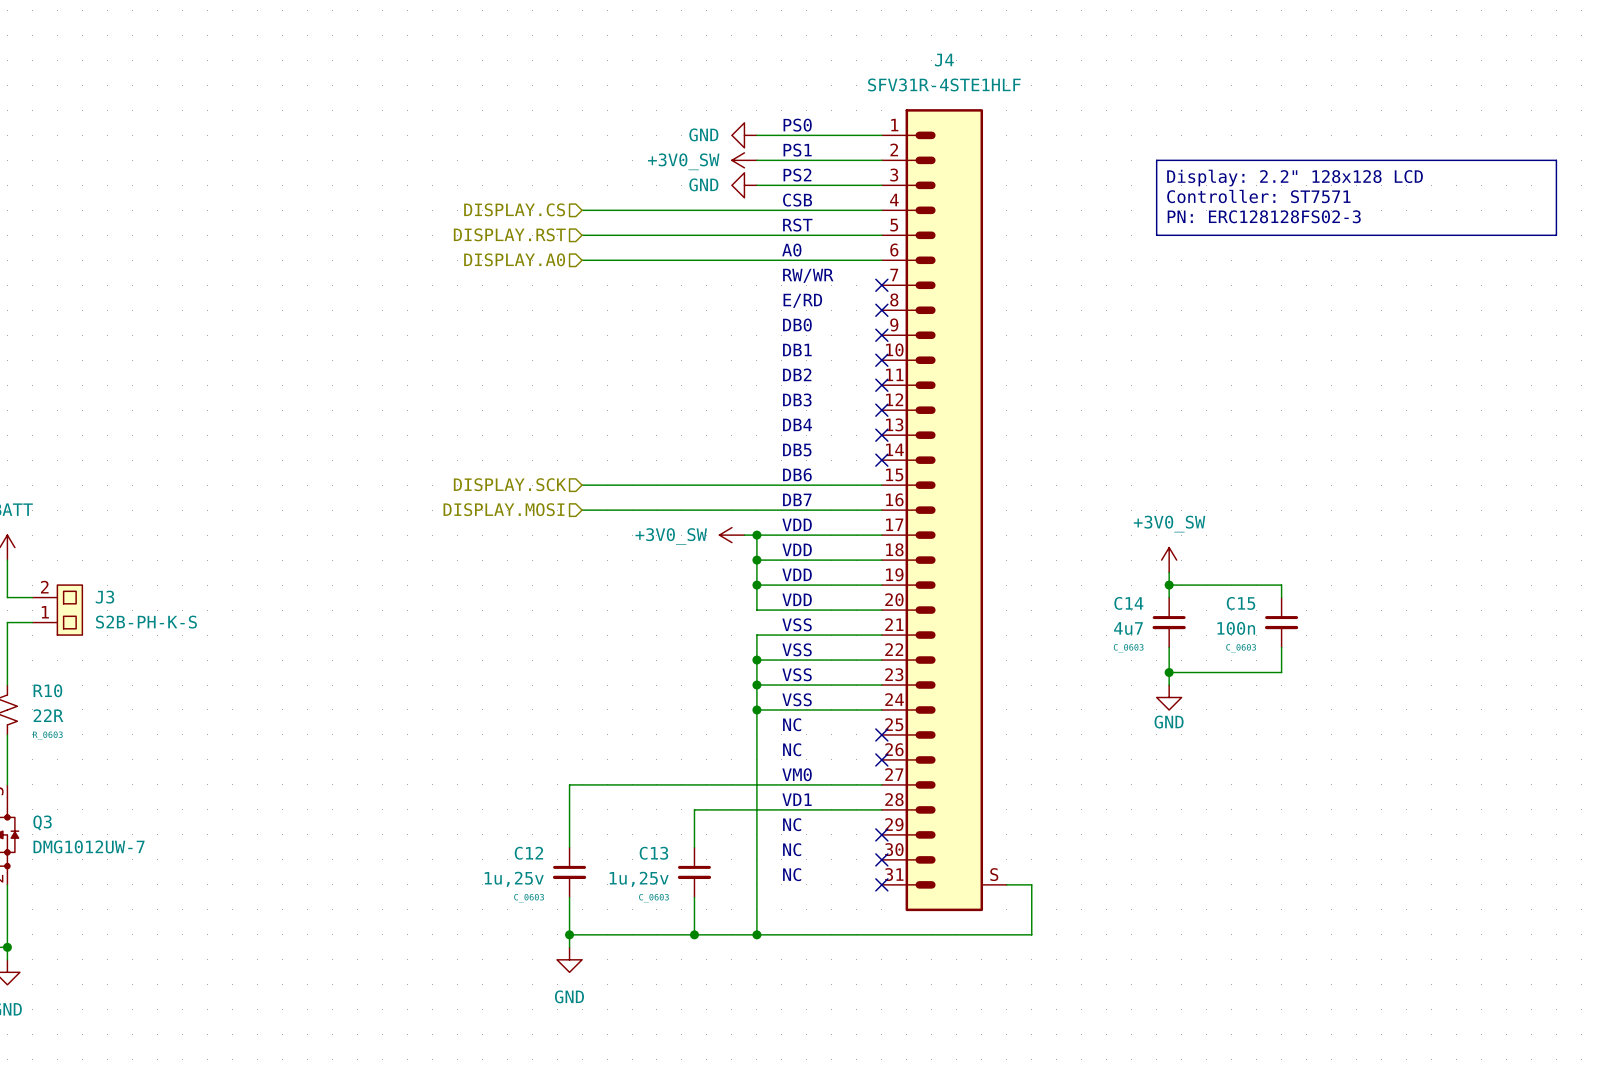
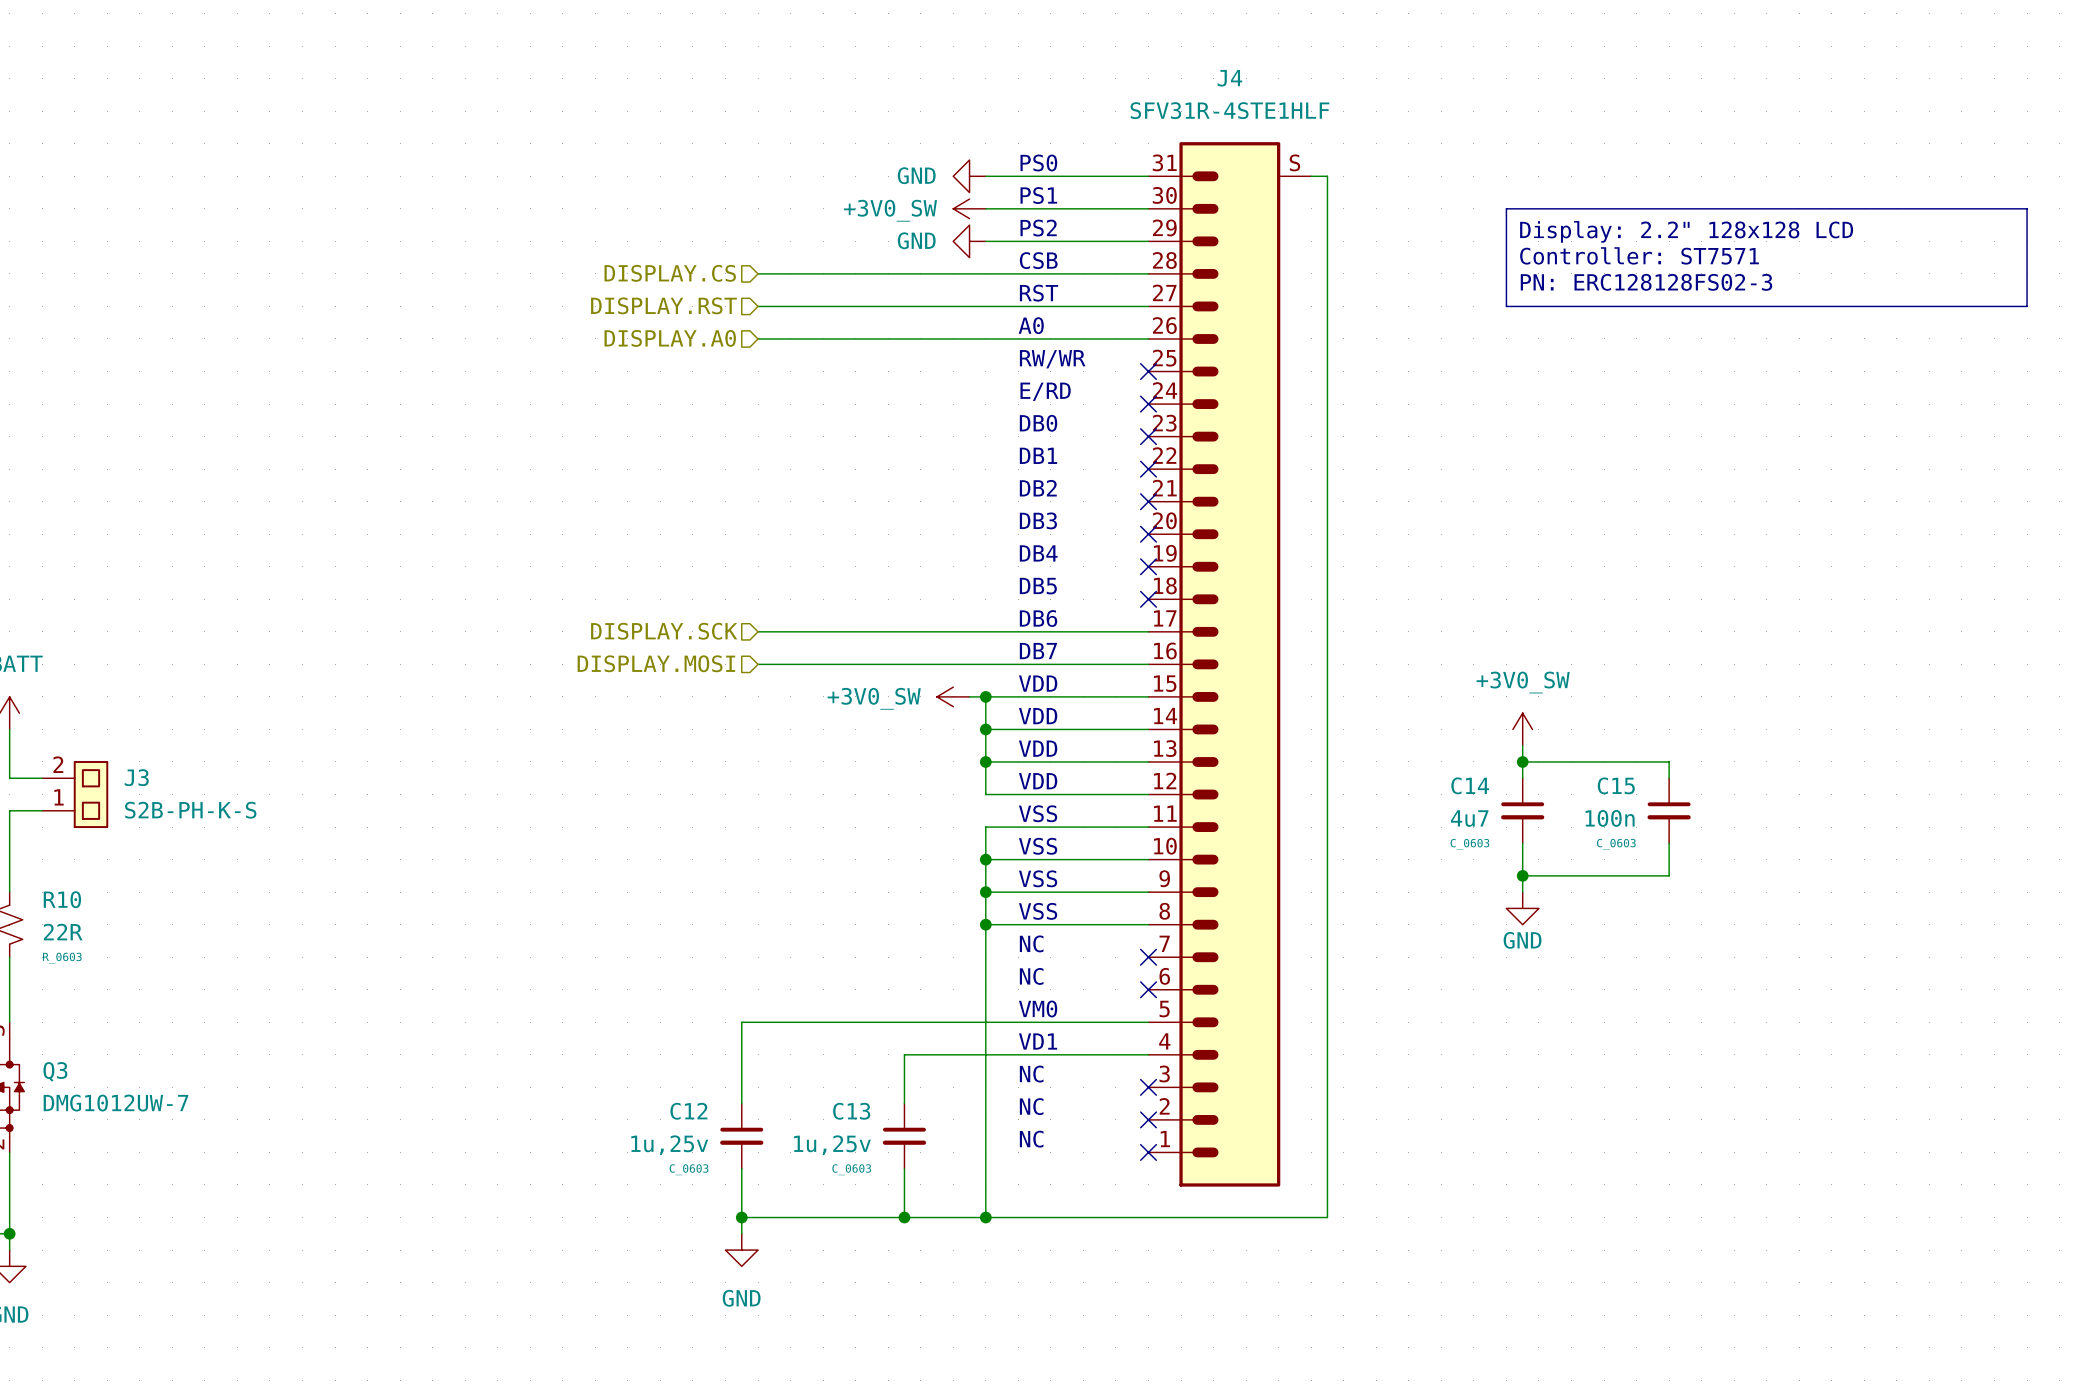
J4 flip: as is (944, 510) -> up-down (1229, 664)
wire: (1006, 884) (1031, 884) (1031, 934) (1019, 934) -> (1311, 176) (1327, 176) (1327, 1217)

